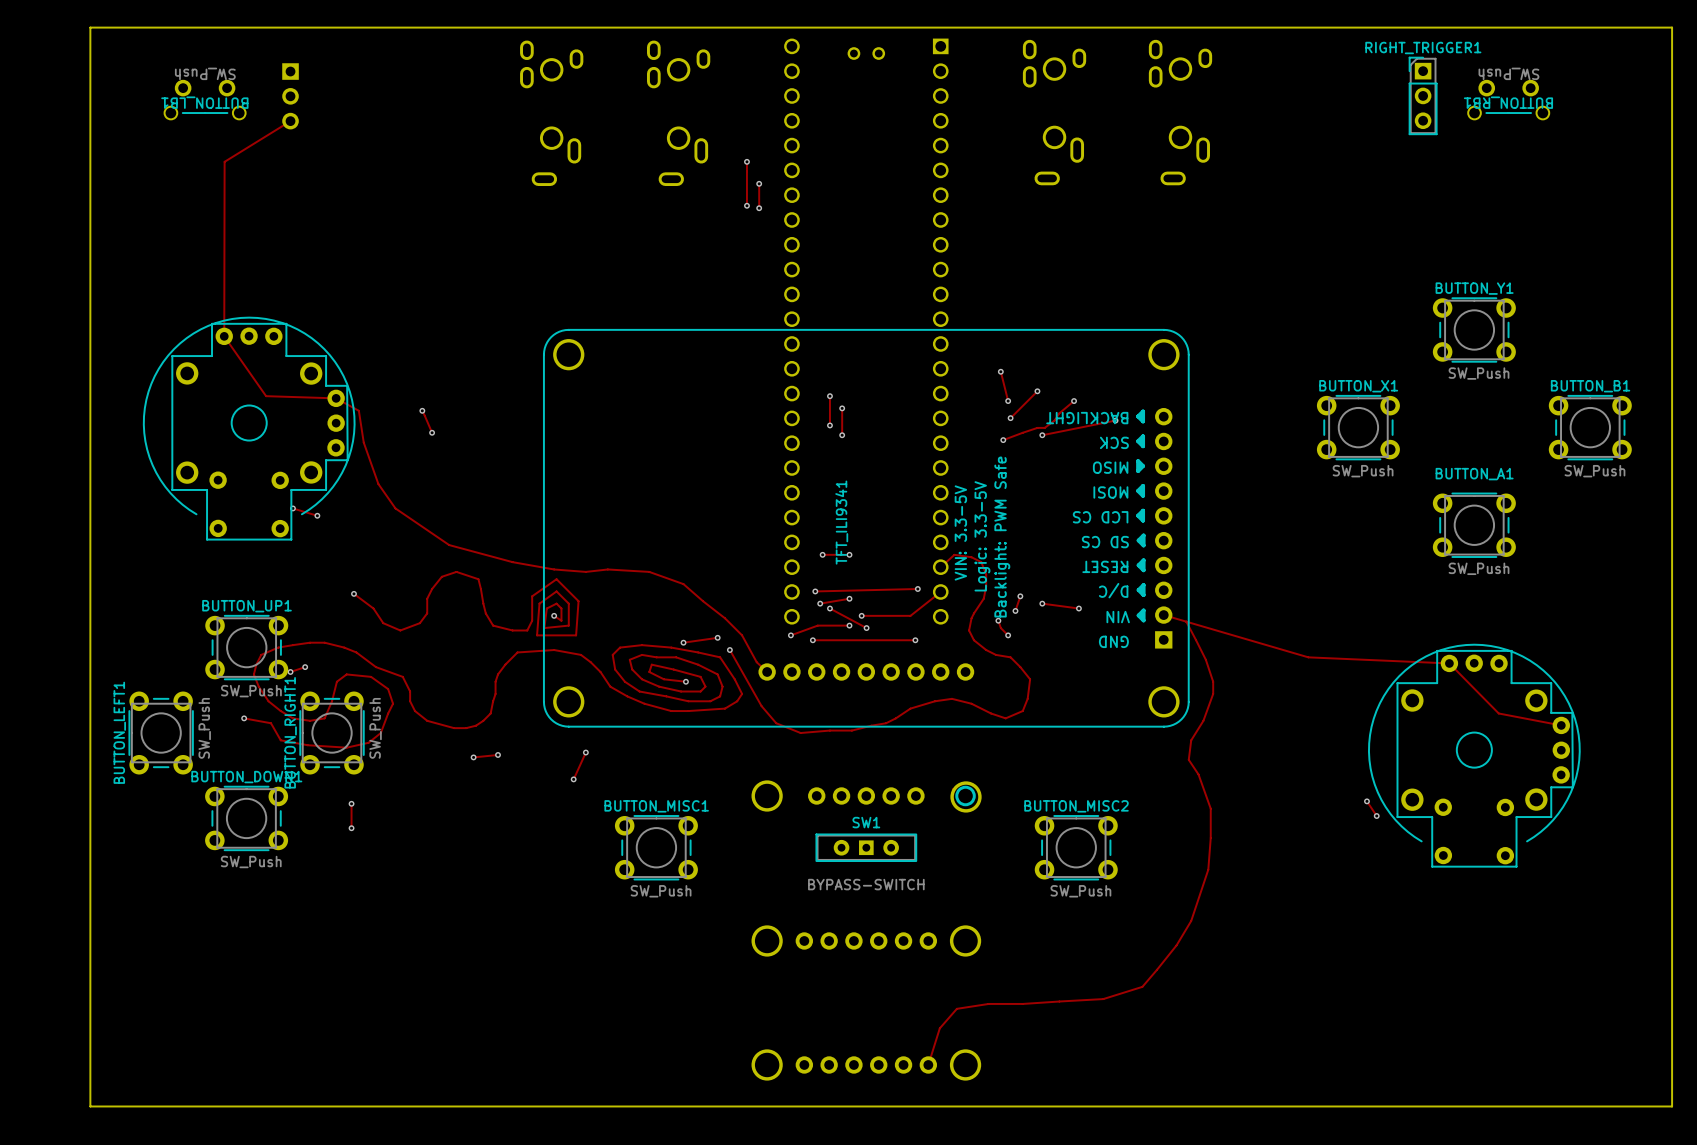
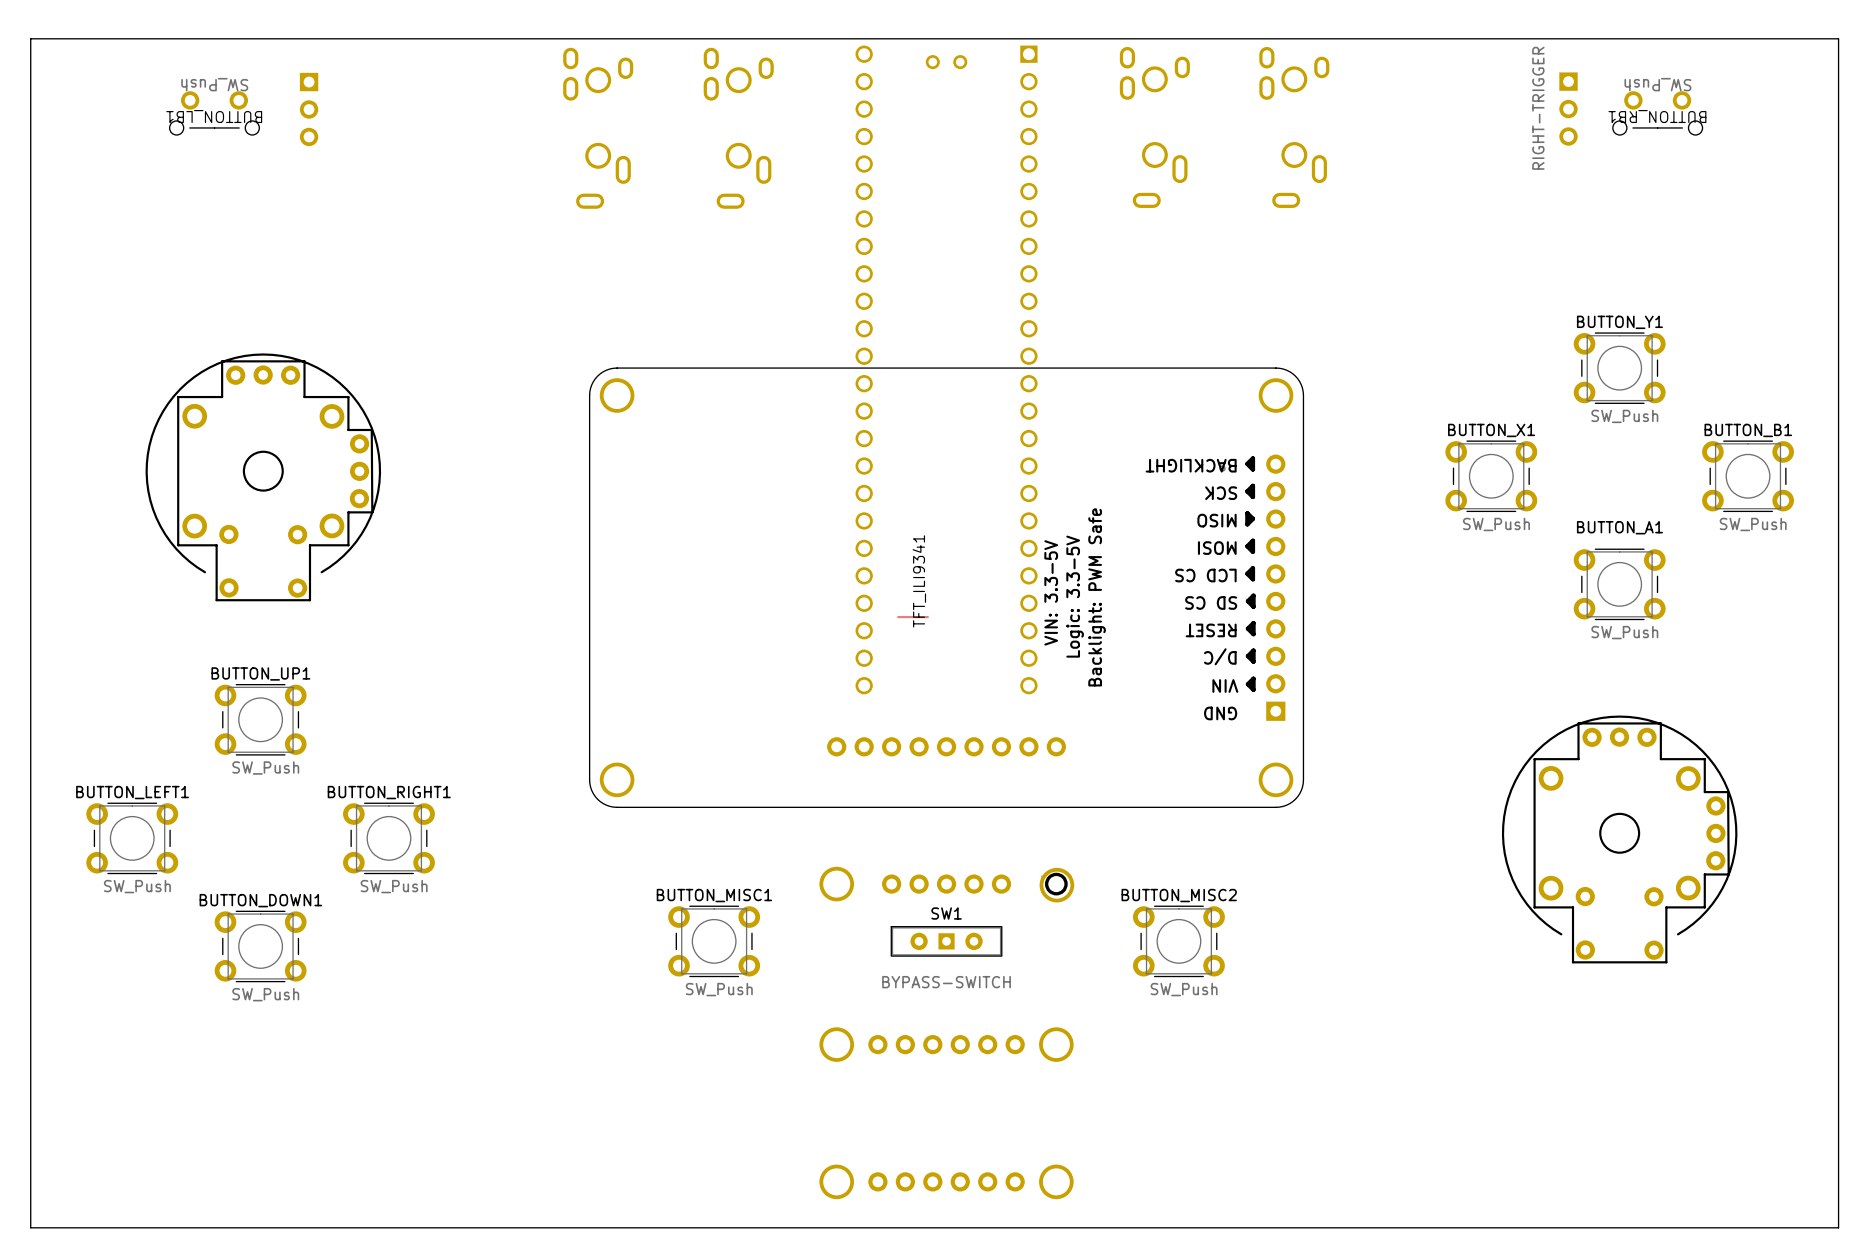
board edge: (1672, 32) (1672, 27) (90, 27) (90, 1106) -> (1838, 38) (30, 38) (30, 1227) (87, 1227)
RIGHT_TRIGGER1: (1423, 95) -> none
part: none -> RIGHT-TRIGGER (1568, 109)
track: (290, 121) (224, 161) (224, 336) (266, 396) (336, 398) (358, 410) (363, 442) (378, 484) (395, 508) (449, 545) (512, 562) (554, 569) (585, 571) (607, 569) (649, 571) (683, 584) (725, 618) (742, 635) (756, 662) (767, 671) -> none
track: (746, 161) (746, 205) -> none
via: (746, 161) -> none
track: (759, 183) (759, 208) -> none
via: (759, 183) -> none
via: (746, 205) -> none
via: (759, 208) -> none
track: (1000, 371) (1008, 401) -> none
via: (1000, 371) -> none
track: (1037, 391) (1010, 418) -> none
via: (1037, 391) -> none
track: (829, 396) (829, 425) -> none
via: (829, 396) -> none
via: (1008, 401) -> none
track: (1074, 401) (1044, 427) (1037, 427) (1003, 440) -> none
via: (1074, 401) -> none
track: (842, 408) (842, 435) -> none
via: (842, 408) -> none
track: (422, 410) (432, 432) -> none
via: (422, 410) -> none
via: (1010, 418) -> none
track: (1115, 420) (1042, 435) -> none
via: (829, 425) -> none
via: (432, 432) -> none
via: (842, 435) -> none
via: (1042, 435) -> none
via: (1003, 440) -> none
track: (292, 508) (317, 515) -> none
via: (292, 508) -> none
via: (317, 515) -> none
via: (822, 554) -> none
via: (849, 554) -> none
track: (940, 567) (954, 554) (971, 557) (981, 562) (986, 574) (986, 586) (983, 598) (971, 618) (969, 630) (973, 640) (986, 650) (995, 654) (1010, 657) (1030, 679) (1027, 698) (1022, 711) (1005, 718) (971, 703) (952, 698) (934, 701) (910, 708) (886, 723) (851, 730) (800, 733) (776, 723) (761, 706) (729, 650) -> none
track: (917, 589) (815, 591) -> none
via: (917, 589) -> none
via: (815, 591) -> none
track: (940, 591) (910, 615) (861, 615) -> none
track: (353, 593) (373, 608) (383, 623) (400, 630) (419, 623) (427, 613) (427, 598) (432, 589) (441, 576) (456, 571) (478, 579) (485, 613) (493, 625) (512, 630) (527, 630) (532, 620) (532, 596) (556, 579) (578, 601) (576, 635) (537, 635) (539, 603) (556, 591) (568, 603) (568, 625) (544, 628) (546, 608) (556, 603) (561, 608) (561, 620) (554, 615) -> none
via: (353, 593) -> none
track: (1020, 596) (1015, 610) -> none
via: (1020, 596) -> none
track: (849, 598) (820, 603) -> none
via: (849, 598) -> none
via: (820, 603) -> none
track: (1042, 603) (1078, 608) -> none
via: (1042, 603) -> none
track: (829, 608) (866, 628) -> none
via: (829, 608) -> none
via: (1078, 608) -> none
via: (1015, 610) -> none
via: (554, 615) -> none
via: (861, 615) -> none
track: (1163, 615) (1308, 657) (1449, 663) (1498, 713) (1561, 725) -> none
track: (998, 620) (1000, 628) (1008, 635) -> none
via: (998, 620) -> none
track: (1186, 621) (1205, 659) (1213, 681) (1213, 693) (1203, 720) (1191, 740) (1188, 759) (1198, 774) (1210, 808) (1208, 869) (1191, 920) (1176, 945) (1142, 986) (1103, 999) (988, 1003) (956, 1008) (939, 1028) (928, 1064) -> none
track: (849, 625) (817, 625) (790, 635) -> none
via: (849, 625) -> none
via: (866, 628) -> none
via: (790, 635) -> none
via: (1008, 635) -> none
track: (717, 637) (683, 642) -> none
via: (717, 637) -> none
track: (812, 640) (915, 640) -> none
via: (812, 640) -> none
via: (915, 640) -> none
via: (683, 642) -> none
via: (729, 650) -> none
track: (305, 667) (290, 671) -> none
via: (305, 667) -> none
via: (290, 671) -> none
track: (685, 681) (663, 679) (649, 671) (651, 664) (700, 676) (705, 686) (700, 691) (681, 691) (659, 686) (642, 679) (632, 669) (629, 659) (642, 654) (676, 657) (698, 664) (717, 674) (722, 686) (720, 696) (710, 701) (688, 701) (639, 691) (624, 681) (615, 669) (612, 654) (620, 647) (642, 645) (671, 647) (720, 657) (742, 693) (737, 701) (725, 708) (671, 711) (644, 703) (610, 686) (600, 671) (580, 654) (554, 650) (517, 652) (498, 674) (490, 713) (476, 725) (454, 728) (427, 720) (415, 711) (410, 701) (410, 691) (402, 676) (375, 667) (356, 652) (344, 647) (324, 642) (310, 642) (278, 647) (261, 654) (253, 674) (258, 686) (268, 701) (292, 718) (310, 720) (324, 718) (332, 701) (336, 681) (346, 674) (371, 676) (388, 689) (393, 703) (380, 733) (368, 742) (346, 747) (307, 745) (280, 740) (270, 723) (244, 718) -> none
via: (685, 681) -> none
via: (244, 718) -> none
BUTTON_LEFT1 rotation: 0° (161, 733) -> 90° clockwise (132, 838)
BUTTON_RIGHT1 rotation: 0° (332, 733) -> 90° clockwise (388, 838)
track: (585, 752) (573, 779) -> none
via: (585, 752) -> none
track: (498, 754) (473, 757) -> none
via: (498, 754) -> none
via: (473, 757) -> none
via: (573, 779) -> none
track: (1366, 801) (1376, 816) -> none
via: (1366, 801) -> none
track: (351, 803) (351, 828) -> none
via: (351, 803) -> none
via: (1376, 816) -> none
BUTTON_DOWN1 position: (246, 818) -> (260, 946)
via: (351, 828) -> none

